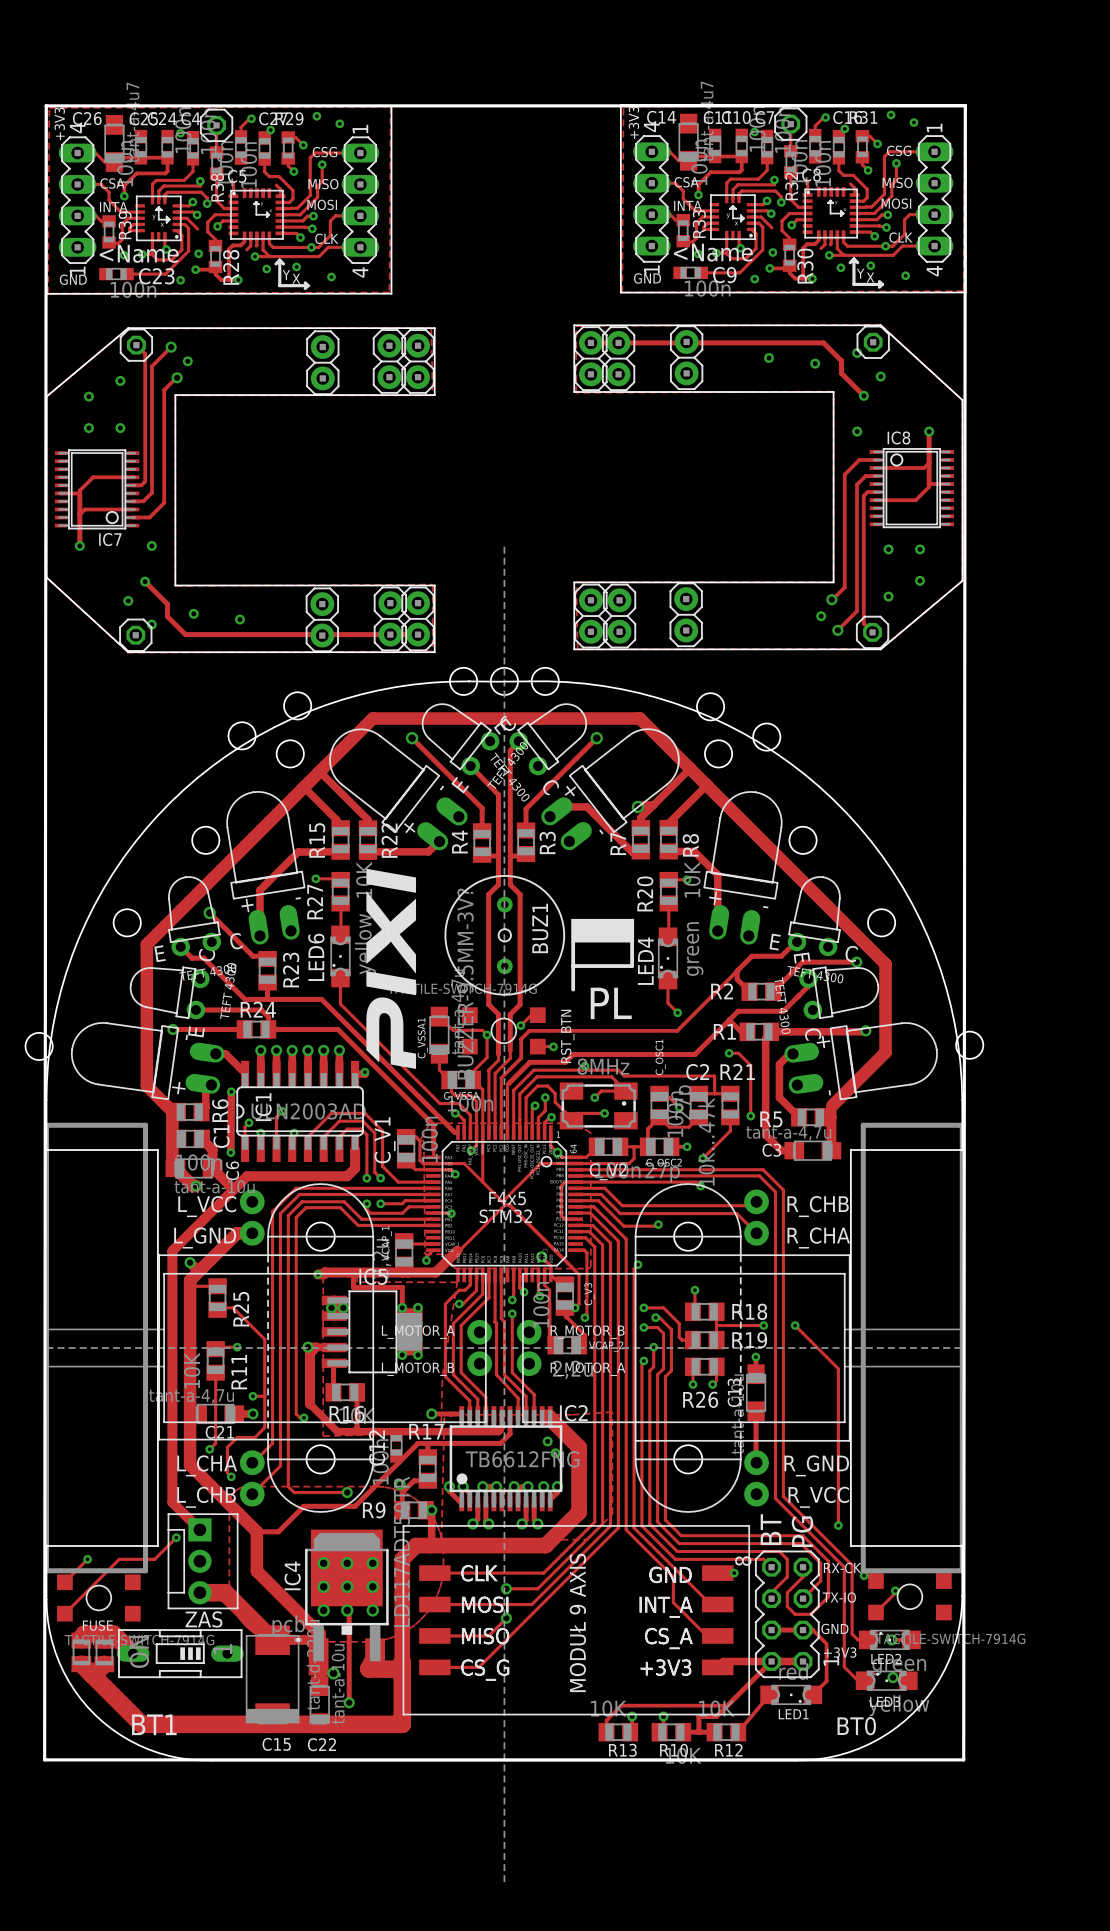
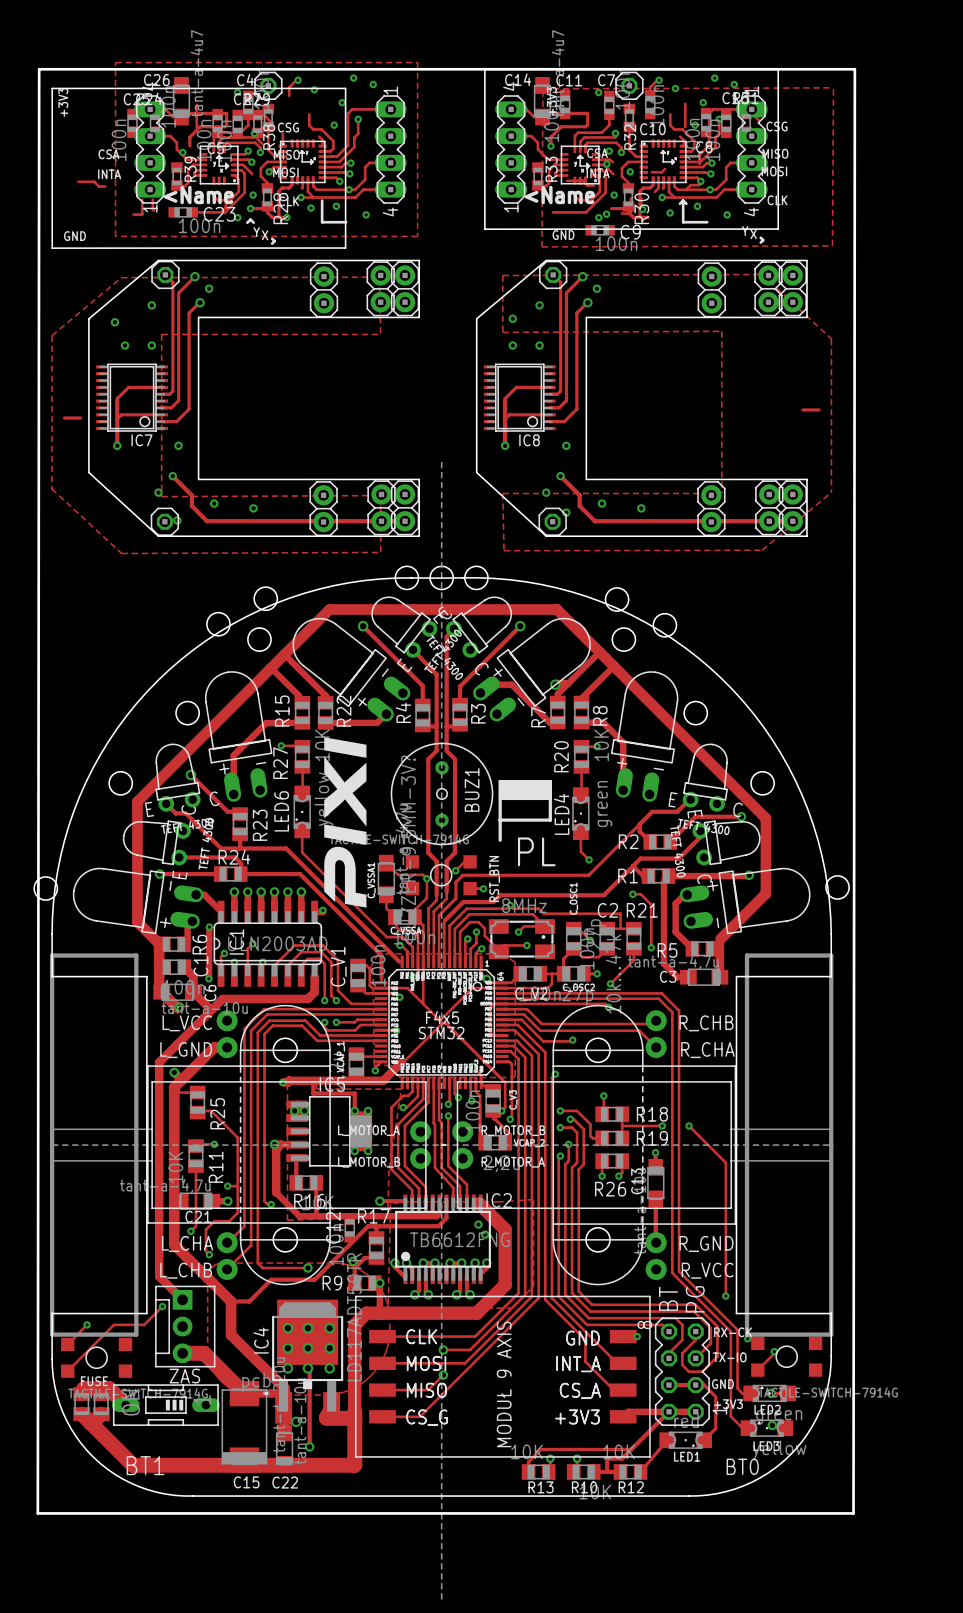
via: none -> (353, 78)
via: none -> (714, 78)
via: none -> (298, 80)
via: none -> (659, 80)
via: none -> (373, 84)
via: none -> (734, 84)
board edge: (620, 104) (965, 104) (965, 292) (620, 292) (620, 104) -> (484, 69) (778, 69) (778, 229) (484, 229) (484, 69)
board edge: (46, 105) (44, 1759) (963, 1759) (965, 105) (46, 105) -> (39, 69) (37, 1513) (853, 1513) (854, 69) (39, 69)
zone outline: (390, 106) (49, 107) (48, 293) (389, 292) (390, 106) -> (115, 62) (115, 236) (417, 236) (417, 62) (115, 62)
via: none -> (675, 88)
via: none -> (314, 89)
via: none -> (237, 92)
via: none -> (598, 92)
via: (891, 115) -> none
via: (316, 116) -> none
C10 name position: C10 (736, 117) -> C10 (652, 129)
track: (825, 117) (815, 126) (815, 135) -> (659, 80) (650, 87) (650, 95)
via: (825, 117) -> none
track: (251, 118) (241, 127) (241, 136) -> (298, 80) (289, 87) (289, 95)
via: (251, 118) -> none
via: none -> (342, 102)
via: none -> (703, 102)
via: (913, 122) -> none
via: (339, 123) -> none
part position: (790, 124) -> (629, 85)
part position: (216, 125) -> (268, 85)
via: (844, 128) -> none
via: (270, 130) -> none
via: (754, 131) -> none
via: (180, 133) -> none
via: none -> (358, 119)
C14 position: (688, 142) -> (542, 101)
via: none -> (719, 119)
C26 position: (114, 143) -> (181, 101)
via: (877, 143) -> none
via: (303, 145) -> none
C11 position: (715, 145) -> (565, 104)
C10 position: (741, 145) -> (650, 104)
C7 position: (767, 147) -> (609, 105)
C4 position: (193, 148) -> (248, 105)
via: none -> (334, 125)
via: none -> (695, 125)
track: (651, 151) (669, 151) (678, 160) (688, 160) (691, 156) (741, 156) (741, 170) (739, 172) (710, 172) (698, 184) (698, 195) -> (511, 109) (526, 109) (534, 117) (542, 117) (544, 113) (587, 113) (587, 124) (585, 126) (561, 126) (550, 137) (550, 146)
track: (934, 151) (889, 151) (884, 156) (884, 194) (871, 206) (854, 207) -> (751, 109) (713, 109) (709, 113) (709, 145) (698, 156) (683, 156)
track: (77, 153) (95, 153) (104, 161) (114, 161) (116, 157) (167, 157) (167, 171) (165, 173) (136, 173) (124, 185) (124, 196) -> (150, 109) (165, 109) (173, 117) (181, 117) (183, 113) (226, 113) (226, 124) (224, 126) (200, 126) (189, 137) (189, 146)
track: (360, 153) (315, 153) (310, 157) (310, 195) (297, 208) (280, 208) -> (390, 109) (352, 109) (348, 113) (348, 145) (337, 156) (322, 156)
track: (767, 157) (767, 170) (758, 179) (730, 179) (727, 182) (726, 198) -> (609, 114) (609, 125) (601, 132) (578, 132) (575, 135) (574, 149)
track: (838, 157) (838, 170) (843, 175) (853, 175) (867, 189) (867, 197) (863, 201) (854, 201) -> (670, 114) (670, 125) (674, 129) (682, 129) (694, 141) (694, 148) (691, 151) (683, 151)
track: (193, 158) (193, 171) (184, 180) (156, 180) (152, 183) (152, 199) -> (248, 114) (248, 125) (240, 132) (217, 132) (214, 135) (213, 149)
track: (264, 158) (264, 171) (269, 176) (279, 176) (292, 190) (292, 198) (289, 202) (280, 202) -> (309, 114) (309, 125) (313, 129) (321, 129) (333, 141) (333, 148) (330, 151) (322, 151)
via: none -> (254, 133)
via: none -> (615, 133)
R32 position: (790, 161) -> (629, 117)
R38 position: (216, 163) -> (268, 117)
track: (896, 163) (896, 180) (891, 184) (891, 196) (874, 213) (854, 213) -> (719, 119) (719, 133) (715, 137) (715, 147) (700, 161) (683, 161)
via: (896, 163) -> none
track: (322, 164) (322, 181) (317, 186) (317, 197) (300, 214) (280, 214) -> (358, 119) (358, 133) (354, 137) (354, 147) (339, 161) (322, 161)
via: (322, 164) -> none
via: (868, 170) -> none
via: (293, 171) -> none
via: none -> (550, 146)
track: (795, 177) (790, 172) (790, 199) (798, 207) (807, 207) -> (633, 130) (629, 126) (629, 150) (636, 156) (643, 156)
track: (221, 178) (216, 173) (216, 200) (224, 208) (233, 208) -> (272, 130) (268, 126) (268, 150) (275, 156) (282, 156)
via: none -> (248, 151)
via: none -> (609, 151)
track: (774, 180) (774, 184) (738, 184) (733, 189) (732, 198) -> (615, 133) (615, 137) (584, 137) (580, 141) (580, 149)
via: (774, 180) -> none
track: (200, 181) (200, 186) (163, 186) (158, 190) (158, 199) -> (254, 133) (254, 137) (223, 137) (219, 141) (219, 149)
track: (233, 181) (233, 196) -> (282, 133) (282, 146)
via: none -> (260, 152)
via: none -> (621, 152)
track: (651, 183) (675, 183) (683, 191) (683, 198) (695, 210) (714, 210) -> (511, 136) (531, 136) (537, 142) (537, 149) (548, 159) (564, 159)
track: (850, 183) (854, 188) (854, 194) -> (680, 136) (683, 140) (683, 146)
track: (77, 184) (101, 184) (109, 192) (109, 200) (120, 212) (140, 212) -> (150, 136) (170, 136) (176, 142) (176, 149) (187, 159) (203, 159)
track: (276, 185) (280, 189) (280, 196) -> (319, 136) (322, 140) (322, 146)
via: none -> (251, 162)
via: none -> (350, 163)
via: none -> (711, 163)
via: (124, 196) -> none
part position: (651, 198) -> (511, 149)
track: (739, 198) (739, 193) (742, 191) (775, 191) (781, 196) (781, 202) -> (585, 149) (587, 142) (616, 142) (621, 147) (621, 152)
part position: (934, 198) -> (751, 149)
track: (164, 199) (164, 194) (167, 192) (201, 192) (207, 198) (207, 203) -> (224, 149) (226, 142) (255, 142) (260, 147) (260, 152)
part position: (77, 200) -> (150, 149)
part position: (360, 200) -> (390, 149)
via: (767, 200) -> none
track: (192, 202) (189, 205) (177, 205) -> (248, 151) (244, 154) (234, 154)
via: (192, 202) -> none
via: (781, 202) -> none
via: (207, 203) -> none
via: none -> (269, 171)
via: none -> (630, 171)
via: none -> (349, 173)
via: none -> (710, 173)
track: (751, 210) (767, 210) (771, 213) -> (596, 159) (609, 159) (612, 162)
track: (177, 212) (193, 212) (197, 214) -> (235, 159) (248, 159) (251, 162)
via: (771, 213) -> none
track: (807, 213) (789, 213) (781, 221) (781, 230) (789, 238) (789, 244) -> (643, 161) (628, 161) (621, 168) (621, 176) (628, 182) (628, 188)
part position: (831, 213) -> (663, 161)
via: (197, 214) -> none
track: (233, 214) (215, 214) (207, 222) (207, 231) (215, 239) (215, 245) -> (282, 161) (267, 161) (260, 168) (260, 176) (267, 182) (267, 188)
part position: (256, 214) -> (302, 161)
track: (887, 214) (881, 214) (877, 219) (854, 219) -> (711, 163) (706, 163) (702, 167) (683, 167)
via: (887, 214) -> none
track: (934, 214) (909, 214) (904, 219) (904, 234) (892, 246) (847, 246) (843, 242) (843, 235) -> (751, 162) (730, 162) (726, 167) (726, 179) (716, 189) (677, 189) (674, 186) (674, 180)
track: (360, 215) (335, 215) (330, 221) (330, 235) (318, 247) (273, 247) (269, 243) (269, 236) -> (390, 162) (369, 162) (365, 167) (365, 179) (355, 189) (316, 189) (313, 186) (313, 180)
via: none -> (339, 181)
via: none -> (700, 181)
track: (313, 216) (307, 216) (302, 220) (280, 220) -> (350, 163) (345, 163) (341, 167) (322, 167)
via: (313, 216) -> none
track: (714, 217) (702, 217) (696, 223) (696, 238) (692, 241) (683, 241) -> (564, 164) (554, 164) (549, 170) (549, 182) (545, 186) (537, 185)
part position: (732, 217) -> (580, 164)
track: (751, 217) (761, 217) (771, 227) -> (595, 164) (604, 164) (613, 174)
track: (140, 218) (128, 218) (122, 224) (122, 239) (118, 243) (109, 242) -> (203, 164) (193, 164) (188, 170) (188, 182) (184, 186) (176, 185)
part position: (158, 218) -> (219, 164)
track: (177, 218) (186, 218) (197, 229) -> (234, 164) (243, 164) (252, 174)
track: (233, 220) (222, 220) (217, 226) -> (282, 167) (273, 167) (269, 171)
track: (714, 223) (707, 223) (704, 226) (704, 229) (714, 229) -> (564, 170) (558, 170) (555, 173) (555, 175) (564, 175)
track: (751, 223) (759, 223) (762, 227) (762, 249) (739, 272) (701, 272) -> (596, 170) (602, 170) (605, 173) (605, 192) (586, 212) (553, 212)
track: (140, 224) (133, 224) (129, 228) (129, 230) (140, 230) -> (203, 170) (197, 170) (194, 173) (194, 175) (203, 175)
track: (177, 224) (184, 224) (188, 228) (188, 251) (165, 274) (126, 274) -> (234, 170) (241, 170) (244, 173) (244, 192) (225, 212) (192, 212)
via: none -> (349, 189)
via: (791, 225) -> none
via: none -> (710, 189)
track: (854, 225) (886, 227) -> (683, 172) (710, 173)
via: (217, 226) -> none
track: (280, 227) (312, 228) -> (322, 172) (349, 173)
via: (886, 227) -> none
via: (312, 228) -> none
track: (751, 229) (756, 234) (756, 248) (746, 258) (731, 258) (726, 253) -> (595, 175) (599, 179) (599, 191) (591, 200) (579, 200) (574, 195)
track: (177, 230) (181, 235) (181, 249) (172, 259) (157, 259) (152, 254) -> (234, 175) (238, 179) (238, 191) (230, 200) (218, 200) (213, 195)
R33 position: (683, 230) -> (537, 176)
R39 position: (109, 231) -> (176, 176)
via: none -> (253, 195)
via: none -> (614, 195)
track: (854, 232) (870, 232) (874, 236) -> (683, 177) (697, 177) (700, 181)
track: (280, 233) (296, 233) (300, 237) -> (322, 177) (336, 177) (339, 181)
via: none -> (301, 197)
via: none -> (662, 197)
track: (818, 235) (818, 240) (814, 244) (807, 244) (803, 248) (803, 278) -> (653, 180) (653, 184) (650, 188) (643, 188) (639, 191) (639, 217)
track: (824, 235) (824, 244) (820, 248) -> (658, 180) (658, 188) (655, 191)
track: (831, 235) (830, 244) -> (663, 180) (663, 188)
track: (837, 235) (837, 248) (843, 255) -> (669, 180) (669, 191) (674, 197)
track: (244, 236) (244, 241) (240, 245) (232, 245) (229, 249) (229, 279) -> (292, 180) (292, 184) (288, 188) (282, 188) (278, 191) (278, 217)
track: (256, 236) (256, 246) -> (302, 180) (302, 188)
track: (263, 236) (263, 249) (269, 256) -> (307, 180) (307, 191) (313, 197)
via: (874, 236) -> none
via: (300, 237) -> none
via: none -> (336, 206)
via: none -> (697, 206)
via: none -> (311, 208)
via: (885, 246) -> none
track: (934, 246) (902, 246) (893, 255) (843, 254) -> (751, 189) (724, 189) (716, 197) (674, 197)
via: none -> (250, 208)
via: (311, 247) -> none
track: (360, 247) (328, 247) (319, 256) (269, 256) -> (390, 189) (363, 189) (355, 197) (313, 197)
via: (166, 249) -> none
via: (198, 253) -> none
via: (716, 253) -> none
via: (142, 254) -> none
via: none -> (366, 214)
via: none -> (727, 214)
via: (124, 255) -> none
R30 position: (789, 255) -> (628, 197)
via: (829, 255) -> none
track: (843, 255) (829, 255) -> (674, 197) (662, 197)
R28 position: (215, 256) -> (267, 197)
via: (255, 256) -> none
track: (269, 256) (255, 256) -> (313, 197) (301, 197)
via: none -> (286, 217)
via: none -> (237, 217)
via: none -> (598, 217)
line: (853, 258) (853, 284) (882, 284) -> (683, 200) (683, 222) (707, 222)
line: (853, 258) (857, 262) -> (683, 200) (686, 203)
line: (853, 258) (850, 262) -> (683, 200) (679, 203)
line: (279, 260) (279, 285) (308, 285) -> (322, 200) (322, 222) (346, 222)
via: (870, 265) -> none
via: (296, 266) -> none
via: (840, 267) -> none
track: (769, 268) (787, 268) (789, 265) (789, 272) (795, 278) (812, 278) -> (611, 208) (626, 208) (628, 206) (628, 212) (633, 217) (647, 217)
via: (769, 268) -> none
track: (195, 269) (213, 269) (215, 266) (215, 274) (221, 279) (238, 280) -> (250, 208) (265, 208) (267, 206) (267, 212) (272, 217) (286, 217)
via: (195, 269) -> none
via: (266, 269) -> none
C23 position: (116, 274) -> (183, 212)
via: (905, 275) -> none
via: (331, 277) -> none
via: (812, 278) -> none
via: (754, 279) -> none
via: (180, 280) -> none
via: (238, 280) -> none
board edge: (574, 325) (574, 392) (833, 392) (833, 582) (574, 582) (574, 649) (880, 649) (962, 580) (962, 400) (880, 325) (574, 325) -> (546, 260) (476, 318) (476, 472) (546, 536) (806, 536) (806, 479) (586, 479) (586, 317) (806, 317) (806, 260) (546, 260)
track: none -> (553, 274) (560, 282) (560, 390) (557, 394) (550, 394)
part: none -> (553, 274)
track: none -> (583, 275) (566, 292) (566, 400) (559, 407) (550, 407)
via: none -> (194, 276)
via: none -> (582, 276)
board edge: (128, 328) (434, 328) (434, 395) (175, 395) (175, 585) (434, 585) (434, 652) (128, 652) (46, 577) (46, 396) (128, 328) -> (158, 260) (419, 260) (419, 317) (198, 317) (198, 479) (419, 479) (419, 536) (158, 536) (88, 472) (88, 318) (158, 260)
via: none -> (209, 288)
part: none -> (380, 288)
part: none -> (405, 288)
via: none -> (596, 288)
part: none -> (768, 288)
part: none -> (792, 288)
part: none -> (324, 289)
track: (590, 342) (823, 342) (841, 360) (841, 373) (863, 395) -> none
part: none -> (711, 289)
part: (873, 342) -> none
track: (136, 345) (145, 353) (145, 481) (141, 485) (133, 485) -> (165, 274) (172, 282) (172, 390) (169, 394) (162, 394)
part position: (136, 345) -> (165, 274)
track: (172, 345) (151, 366) (151, 492) (143, 501) (133, 501) -> (196, 275) (178, 292) (178, 400) (171, 407) (162, 407)
via: (171, 347) -> none
via: (857, 352) -> none
part: (686, 357) -> none
via: (769, 357) -> none
via: none -> (200, 302)
part: (590, 358) -> none
part: (618, 358) -> none
track: none -> (587, 302) (576, 313) (576, 409) (564, 421) (550, 421)
via: none -> (587, 302)
via: none -> (151, 305)
via: (187, 361) -> none
part: (389, 361) -> none
part: (418, 361) -> none
via: none -> (539, 305)
part: (322, 362) -> none
via: (815, 363) -> none
via: none -> (512, 318)
via: (880, 376) -> none
track: (177, 377) (164, 390) (164, 502) (149, 517) (133, 517) -> (200, 302) (189, 313) (189, 409) (176, 421) (162, 421)
via: (177, 377) -> none
via: (863, 395) -> none
via: (88, 396) -> none
via: none -> (125, 345)
via: none -> (151, 345)
via: none -> (512, 345)
via: none -> (539, 345)
via: (88, 428) -> none
via: (120, 428) -> none
via: (857, 431) -> none
track: (929, 431) (929, 486) (915, 500) (875, 500) -> none
via: (929, 431) -> none
track: none -> (550, 387) (516, 387) (505, 398) (505, 445)
track: (875, 459) (859, 459) (844, 474) (844, 587) (831, 599) -> none
track: (929, 462) (924, 468) (875, 468) -> none
track: (875, 476) (865, 476) (857, 484) (857, 611) (836, 631) -> none
track: (133, 477) (93, 477) (79, 490) (79, 545) -> (162, 387) (128, 387) (117, 398) (117, 445)
IC8 rotation: 0° (911, 488) -> 180° (519, 397)
IC8 position: (911, 488) -> (519, 397)
IC7 position: (97, 489) -> (131, 397)
track: none -> (550, 414) (509, 414) (505, 419)
track: (875, 492) (867, 492) (863, 495) (863, 623) (872, 632) -> none
track: (133, 509) (84, 509) (79, 514) -> (162, 414) (121, 414) (117, 419)
via: none -> (117, 445)
via: none -> (178, 445)
via: none -> (505, 445)
via: none -> (566, 445)
via: (79, 545) -> none
via: (151, 545) -> none
via: (888, 549) -> none
via: (920, 549) -> none
via: none -> (172, 476)
track: none -> (560, 476) (579, 495) (579, 505) (594, 521) (792, 521)
via: none -> (560, 476)
via: (920, 580) -> none
track: (145, 581) (167, 604) (167, 616) (185, 634) (418, 634) -> (172, 476) (191, 495) (191, 505) (207, 521) (405, 521)
via: (145, 581) -> none
via: none -> (158, 492)
via: none -> (546, 492)
via: none -> (214, 503)
via: none -> (602, 503)
via: (888, 596) -> none
via: none -> (253, 508)
part: none -> (381, 507)
part: none -> (405, 507)
via: none -> (641, 508)
via: (831, 599) -> none
part: none -> (769, 507)
part: none -> (792, 507)
via: (128, 600) -> none
part: none -> (323, 508)
part: none -> (711, 508)
via: none -> (566, 512)
part: (686, 614) -> none
part: none -> (552, 521)
part: (590, 616) -> none
part: (619, 616) -> none
via: (821, 616) -> none
part: (390, 618) -> none
part: (418, 618) -> none
via: (239, 619) -> none
part: (322, 619) -> none
via: (151, 624) -> none
via: (837, 630) -> none
part: (872, 632) -> none
part position: (135, 635) -> (164, 521)

